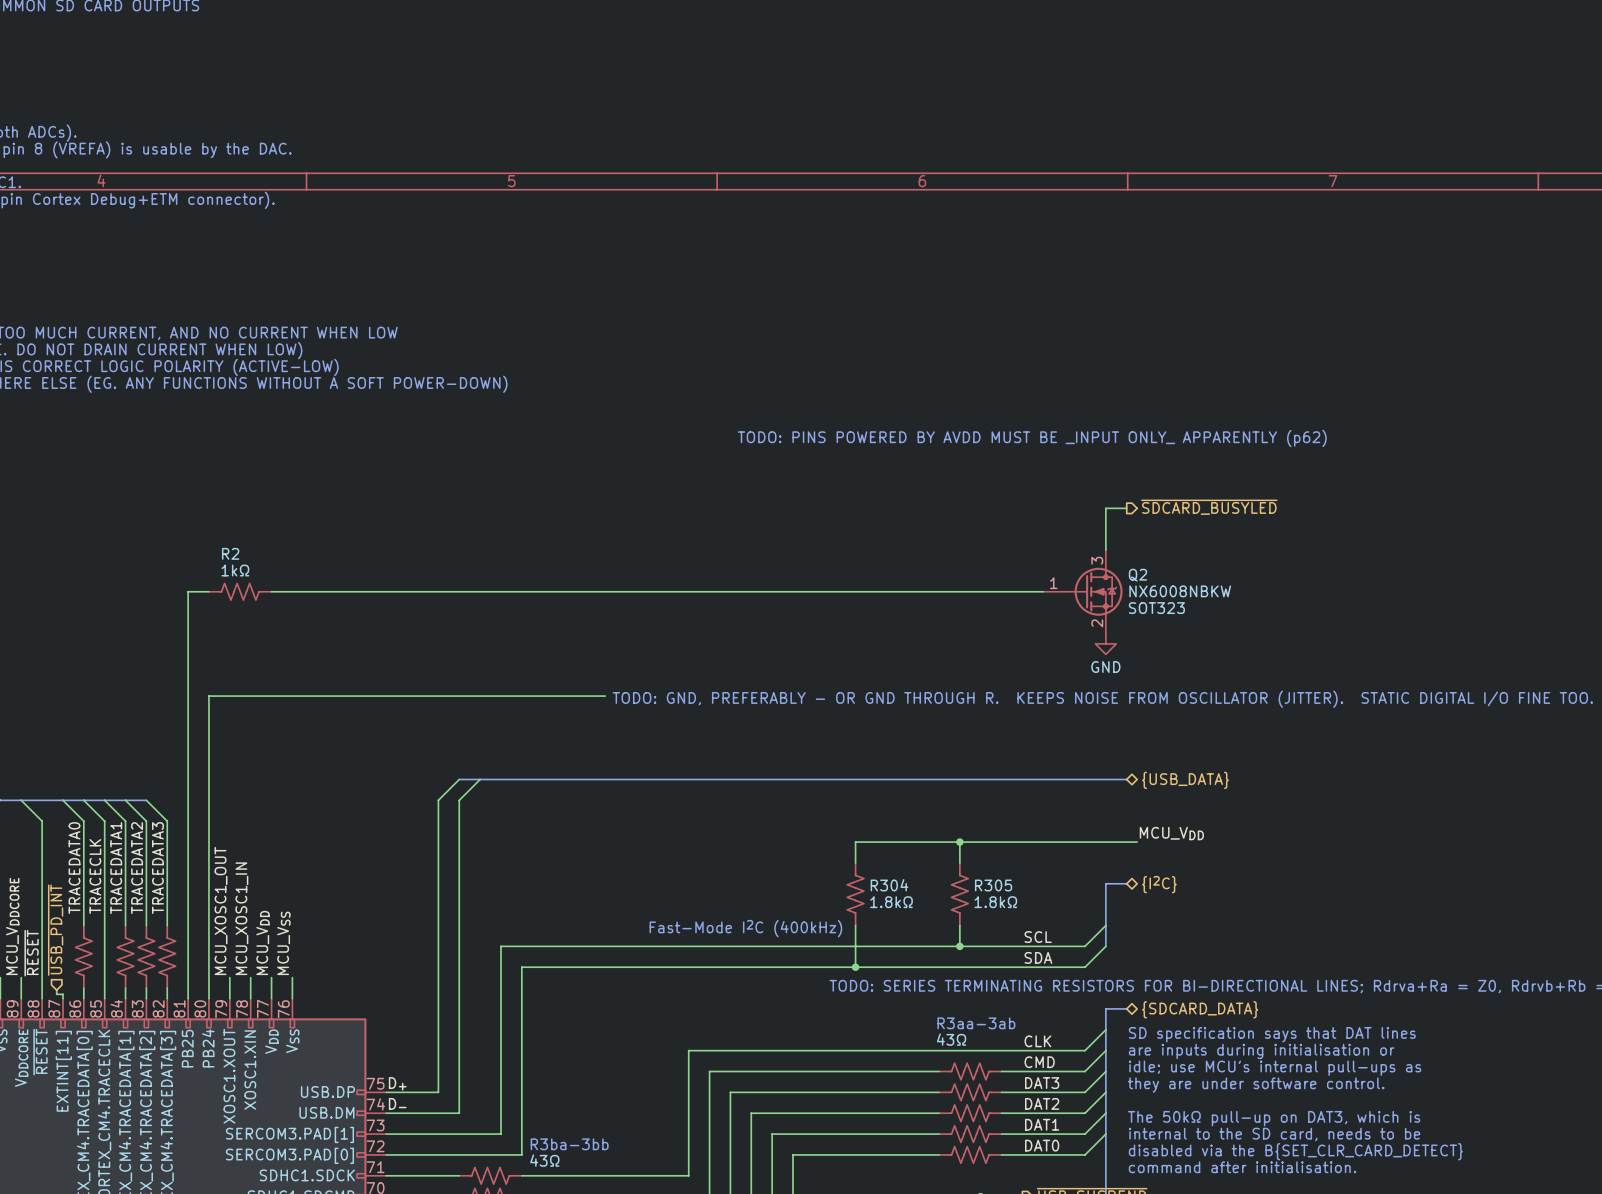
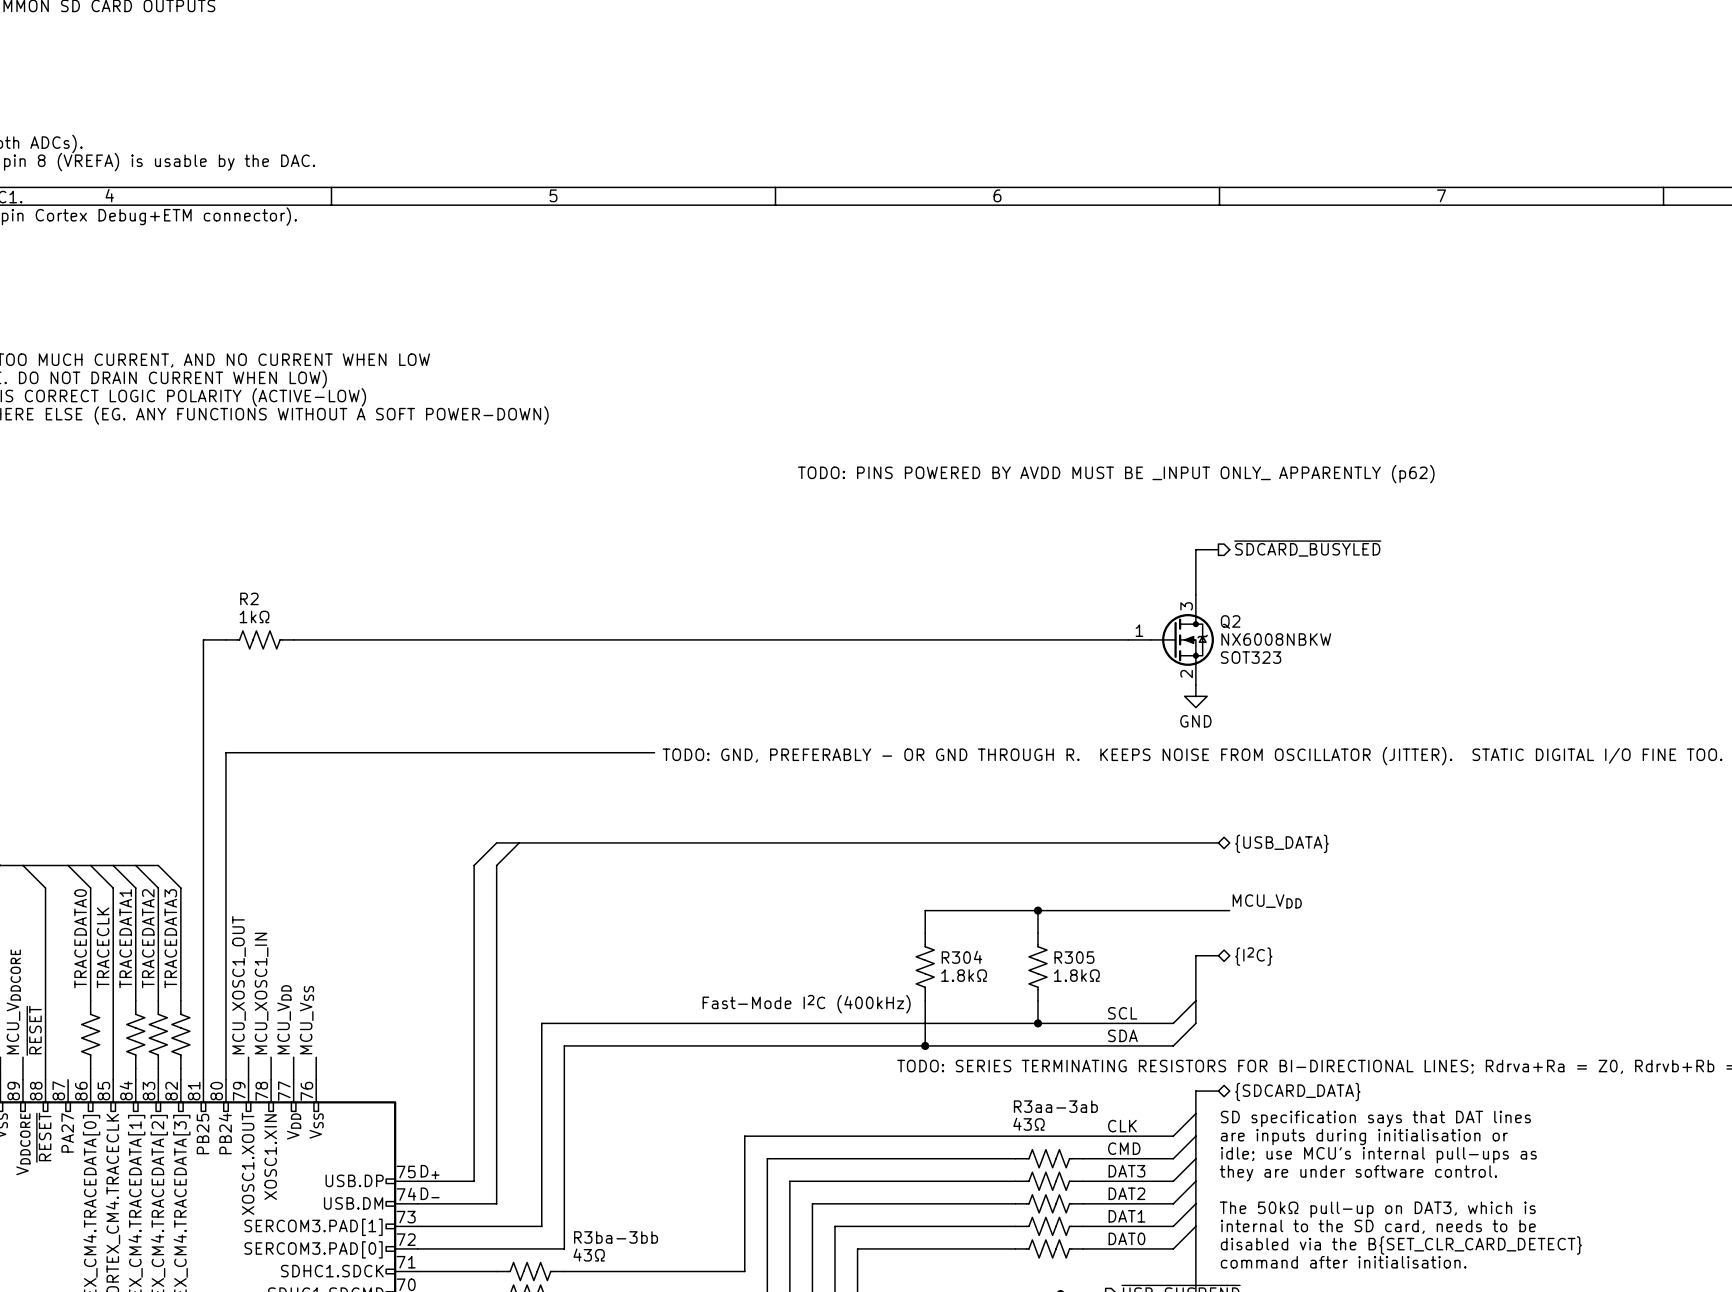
hierarchical label: ~{USB_PD_INT} (55, 930) -> none
wire: (56, 990) (56, 994) (62, 994) (62, 998) -> none
part pin name: EXTINT[11] (63, 1071) -> PA27 (67, 1132)

